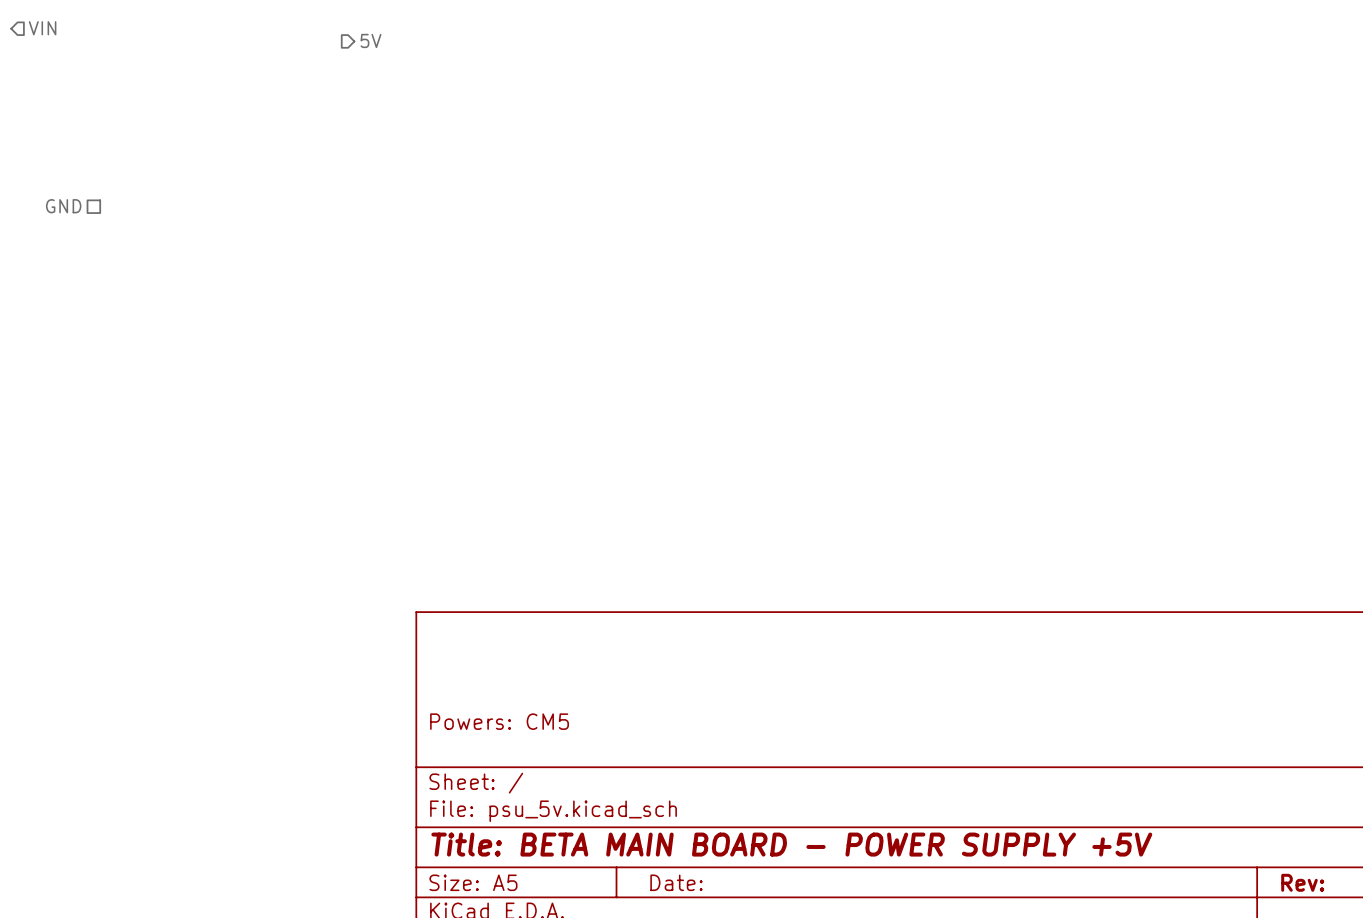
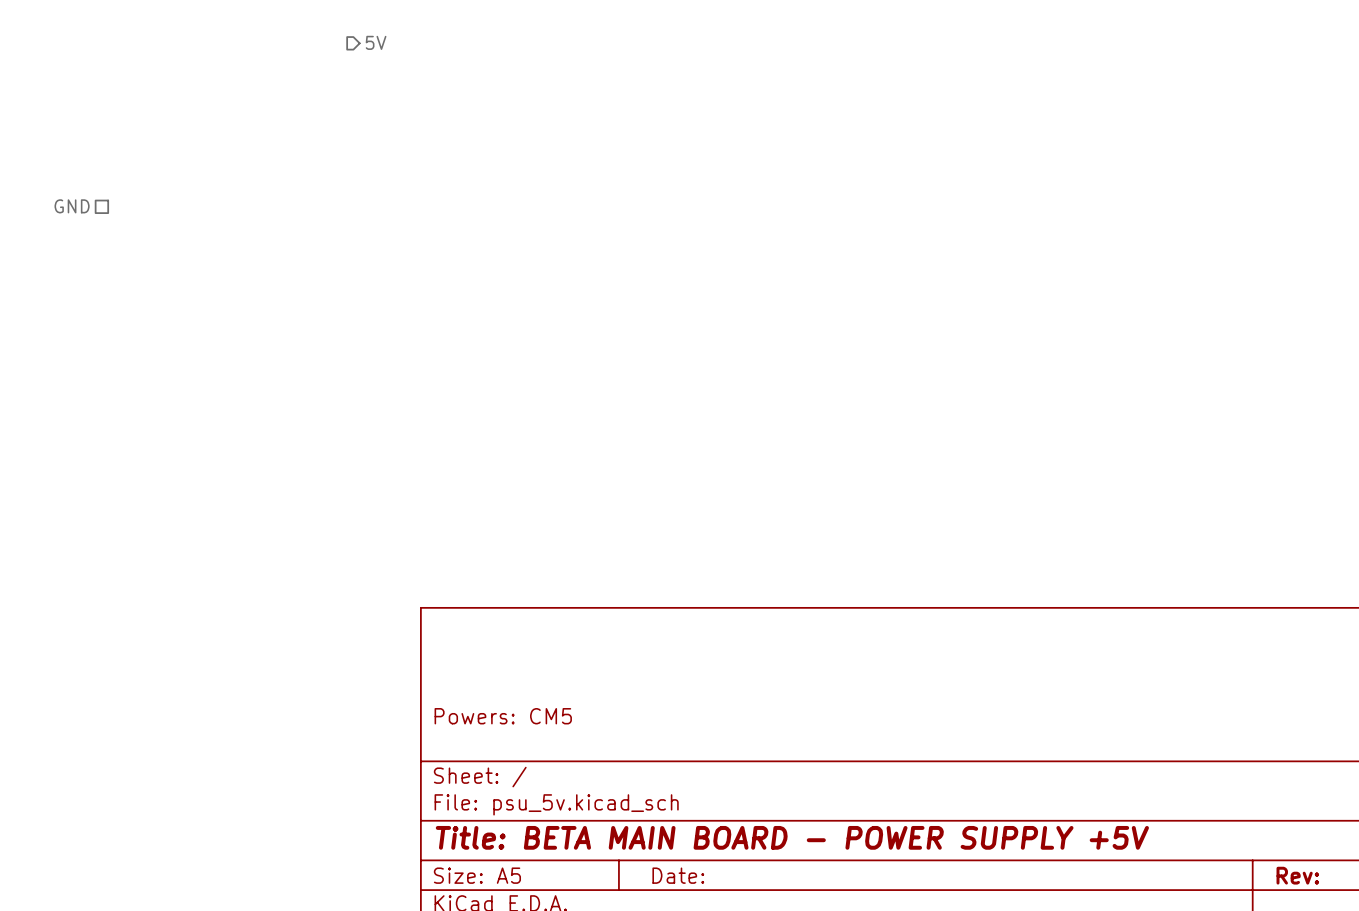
hierarchical label: VIN (42, 28) -> none

